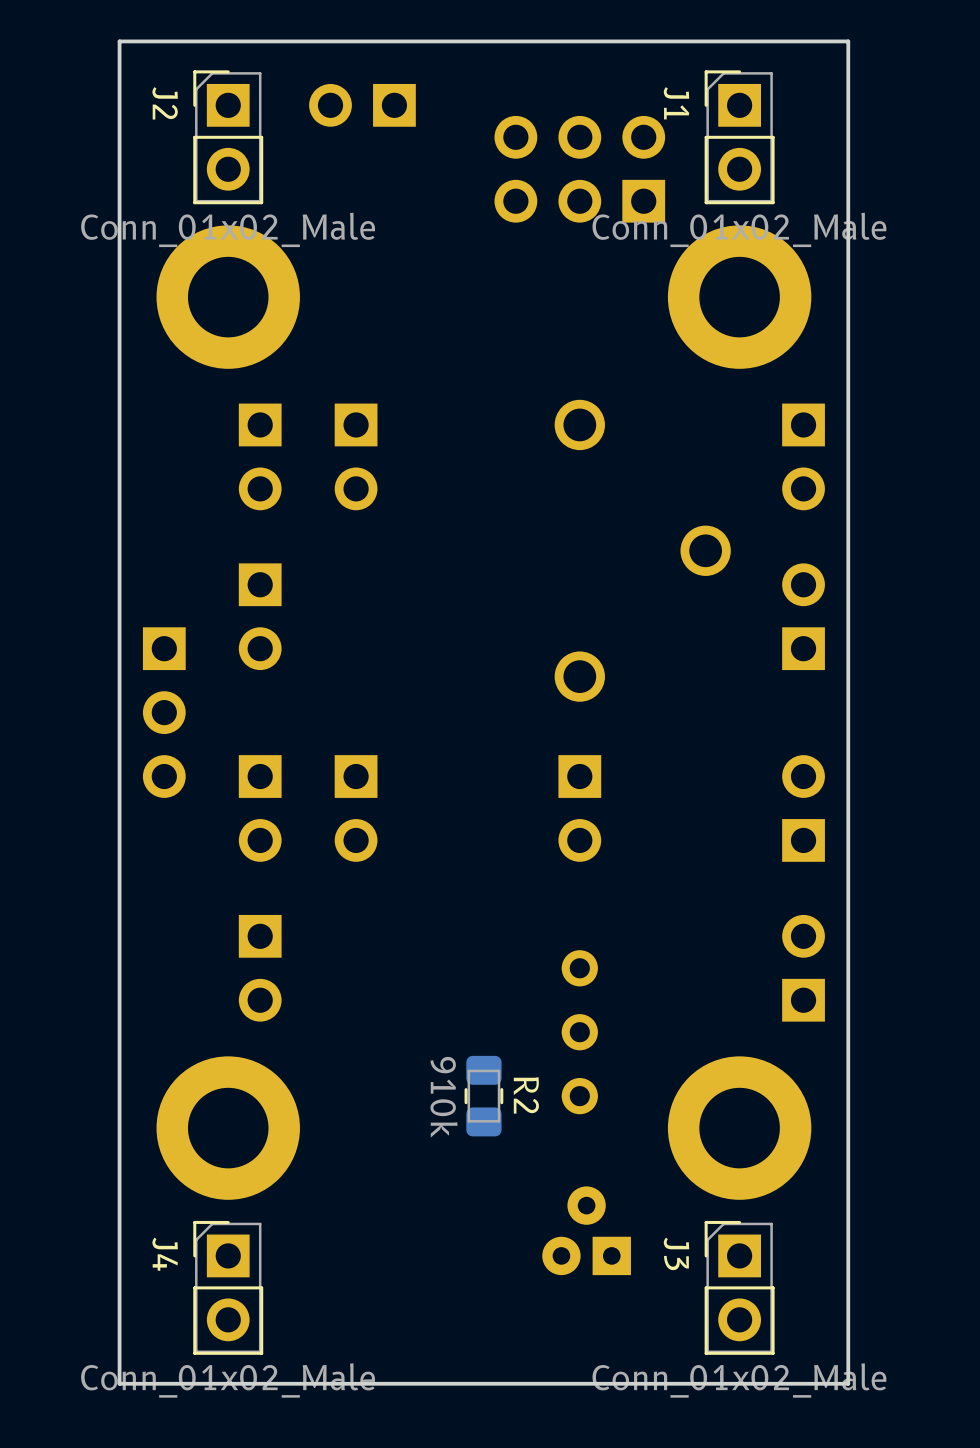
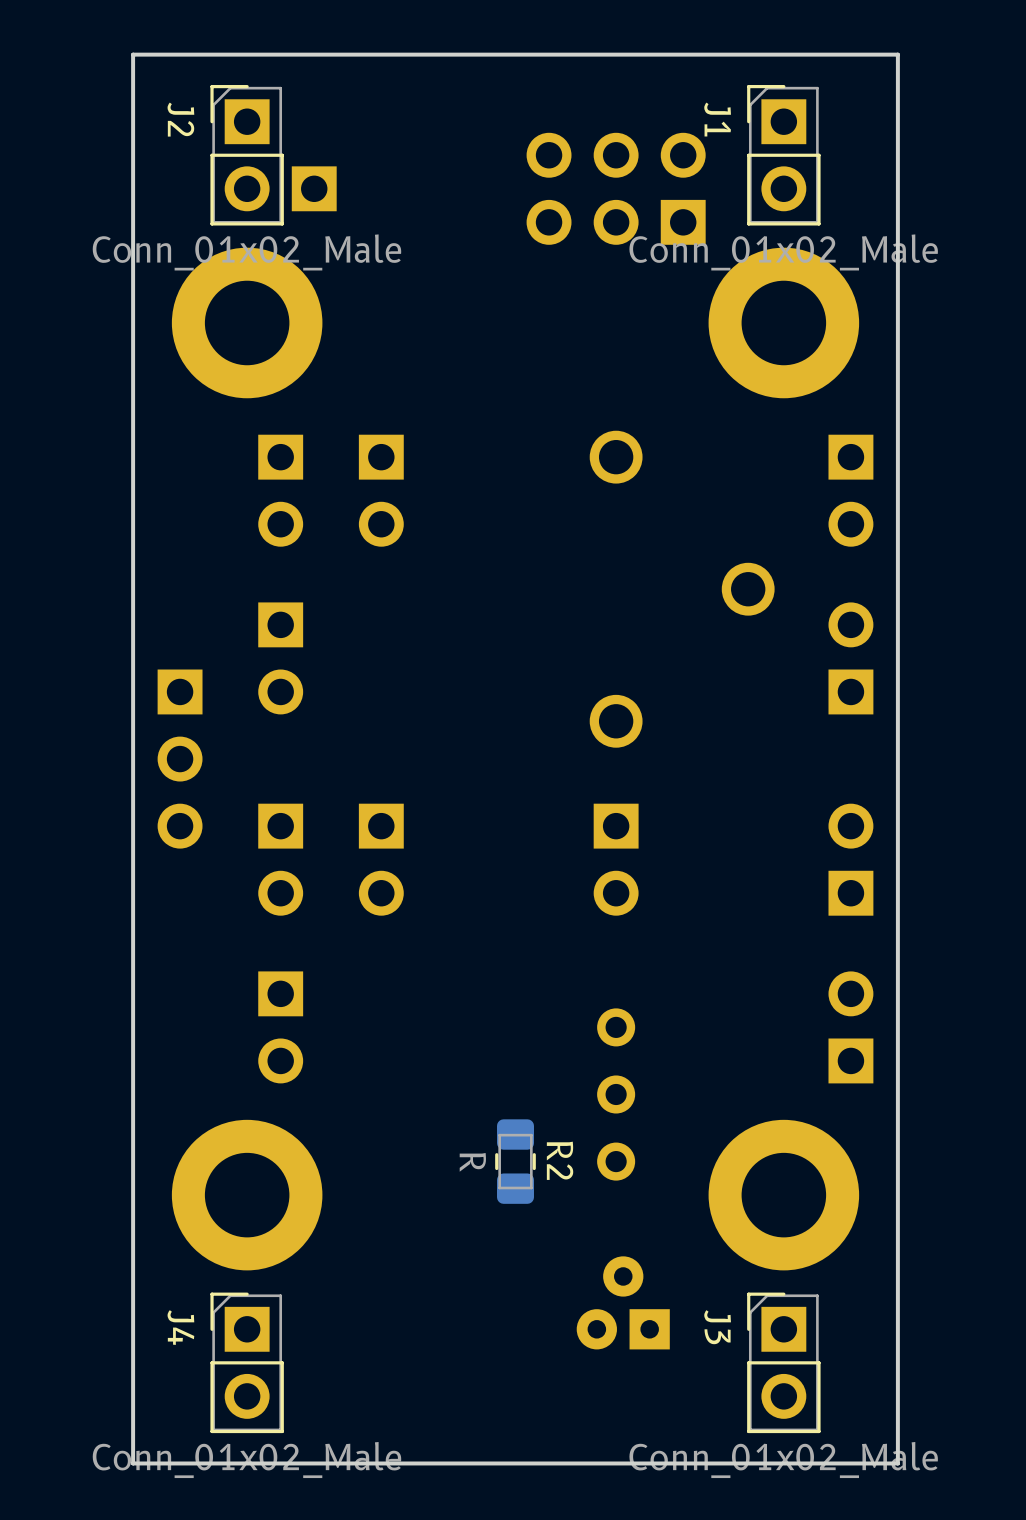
part: (362, 105) -> none
part: none -> (314, 188)
R2 value: 910k (444, 1097) -> R (472, 1162)

